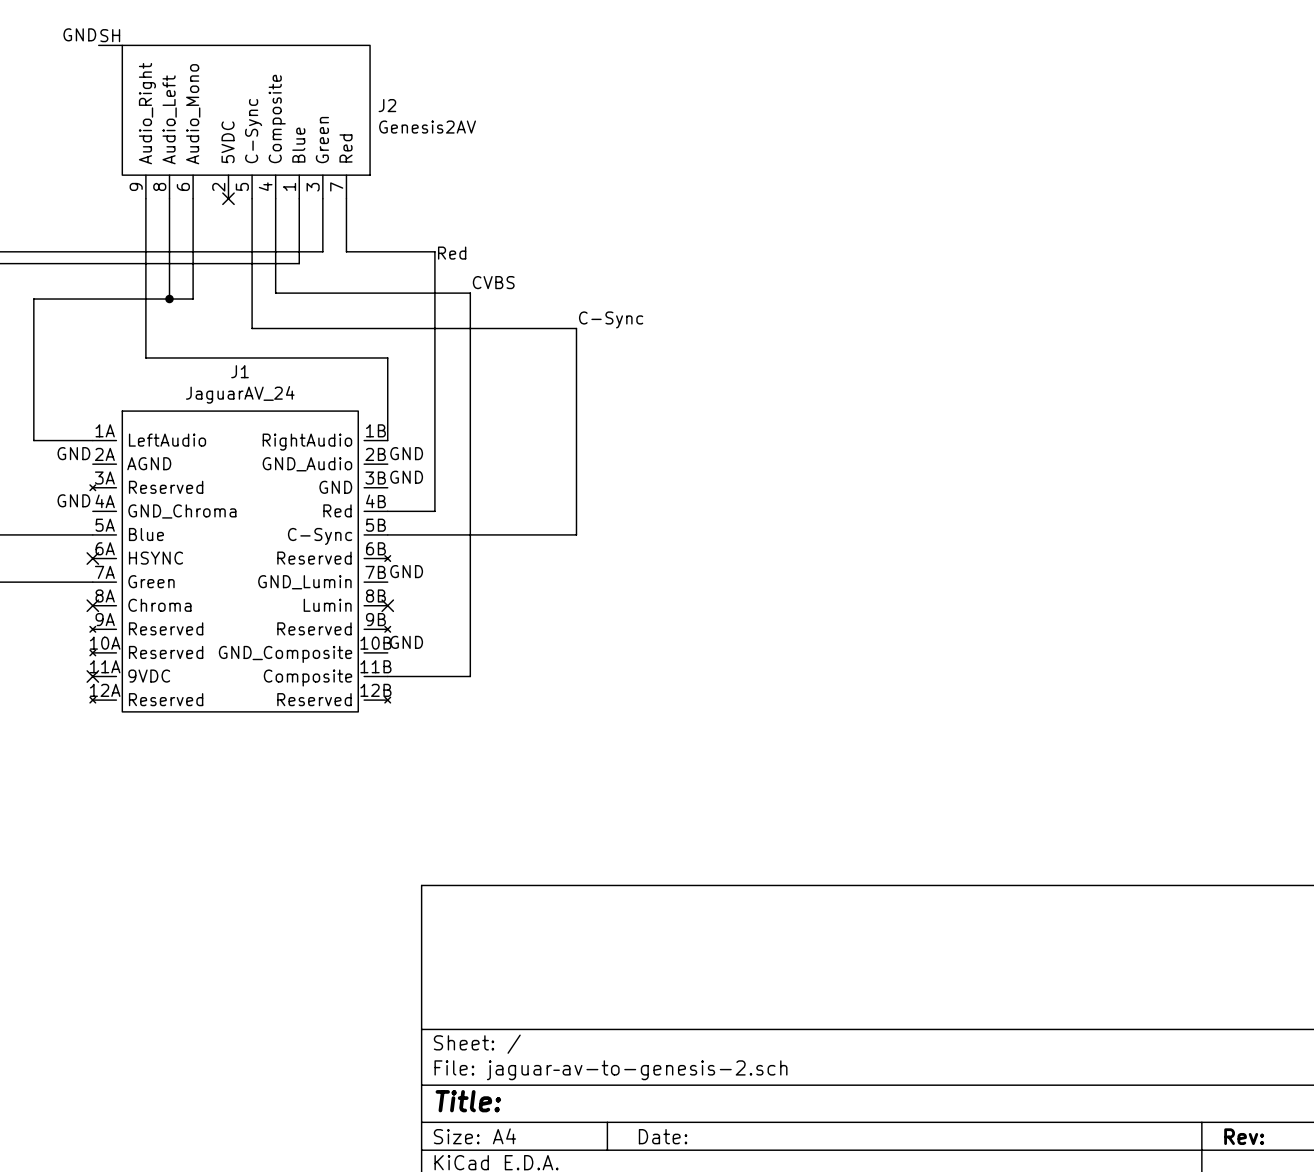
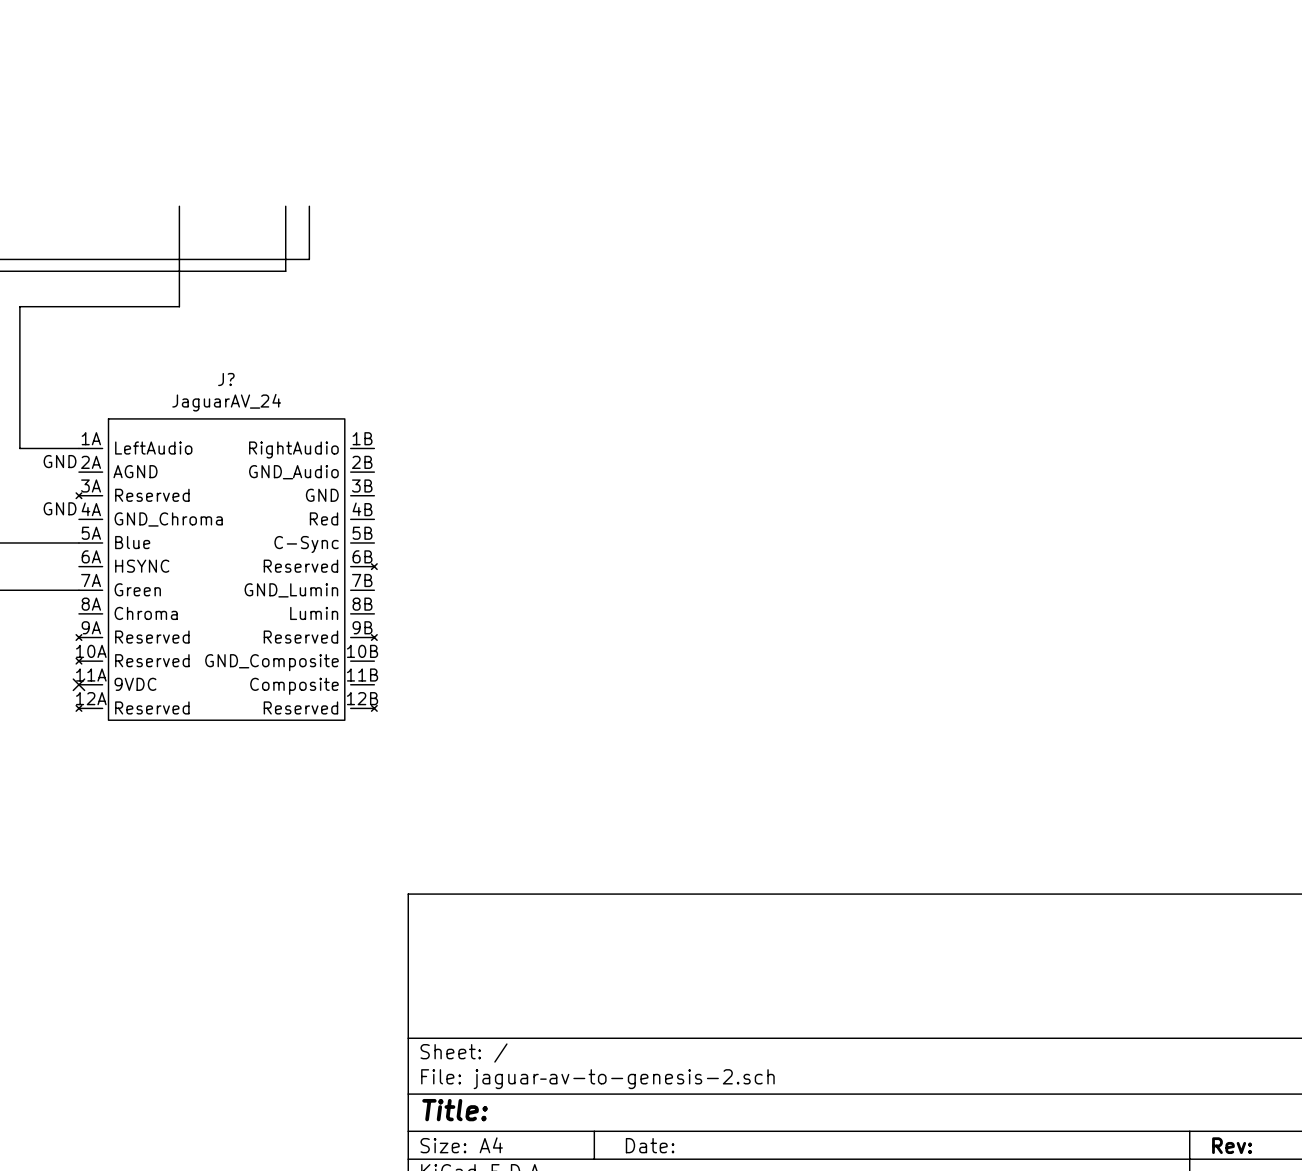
label: GND (79, 34) -> none
J2: Genesis2AV (234, 122) -> none
wire: (145, 198) (145, 357) (387, 357) (387, 440) -> none
wire: (169, 198) (169, 299) -> none
no-connect mark: (228, 198) -> none
wire: (252, 198) (252, 328) (576, 328) (576, 534) (387, 534) -> none
wire: (275, 198) (275, 293) (470, 293) (470, 676) (387, 676) -> none
wire: (346, 198) (346, 251) (434, 251) (434, 511) (387, 511) -> none
label: Red (452, 253) -> none
label: CVBS (493, 282) -> none
junction: (169, 299) -> none
label: C-Sync (611, 319) -> none
J1 name: J1 (240, 371) -> J? (226, 379)
label: GND (406, 453) -> none
label: GND (406, 477) -> none
no-connect mark: (92, 558) -> none
label: GND (406, 571) -> none
no-connect mark: (92, 605) -> none
no-connect mark: (387, 605) -> none
label: GND (406, 642) -> none

